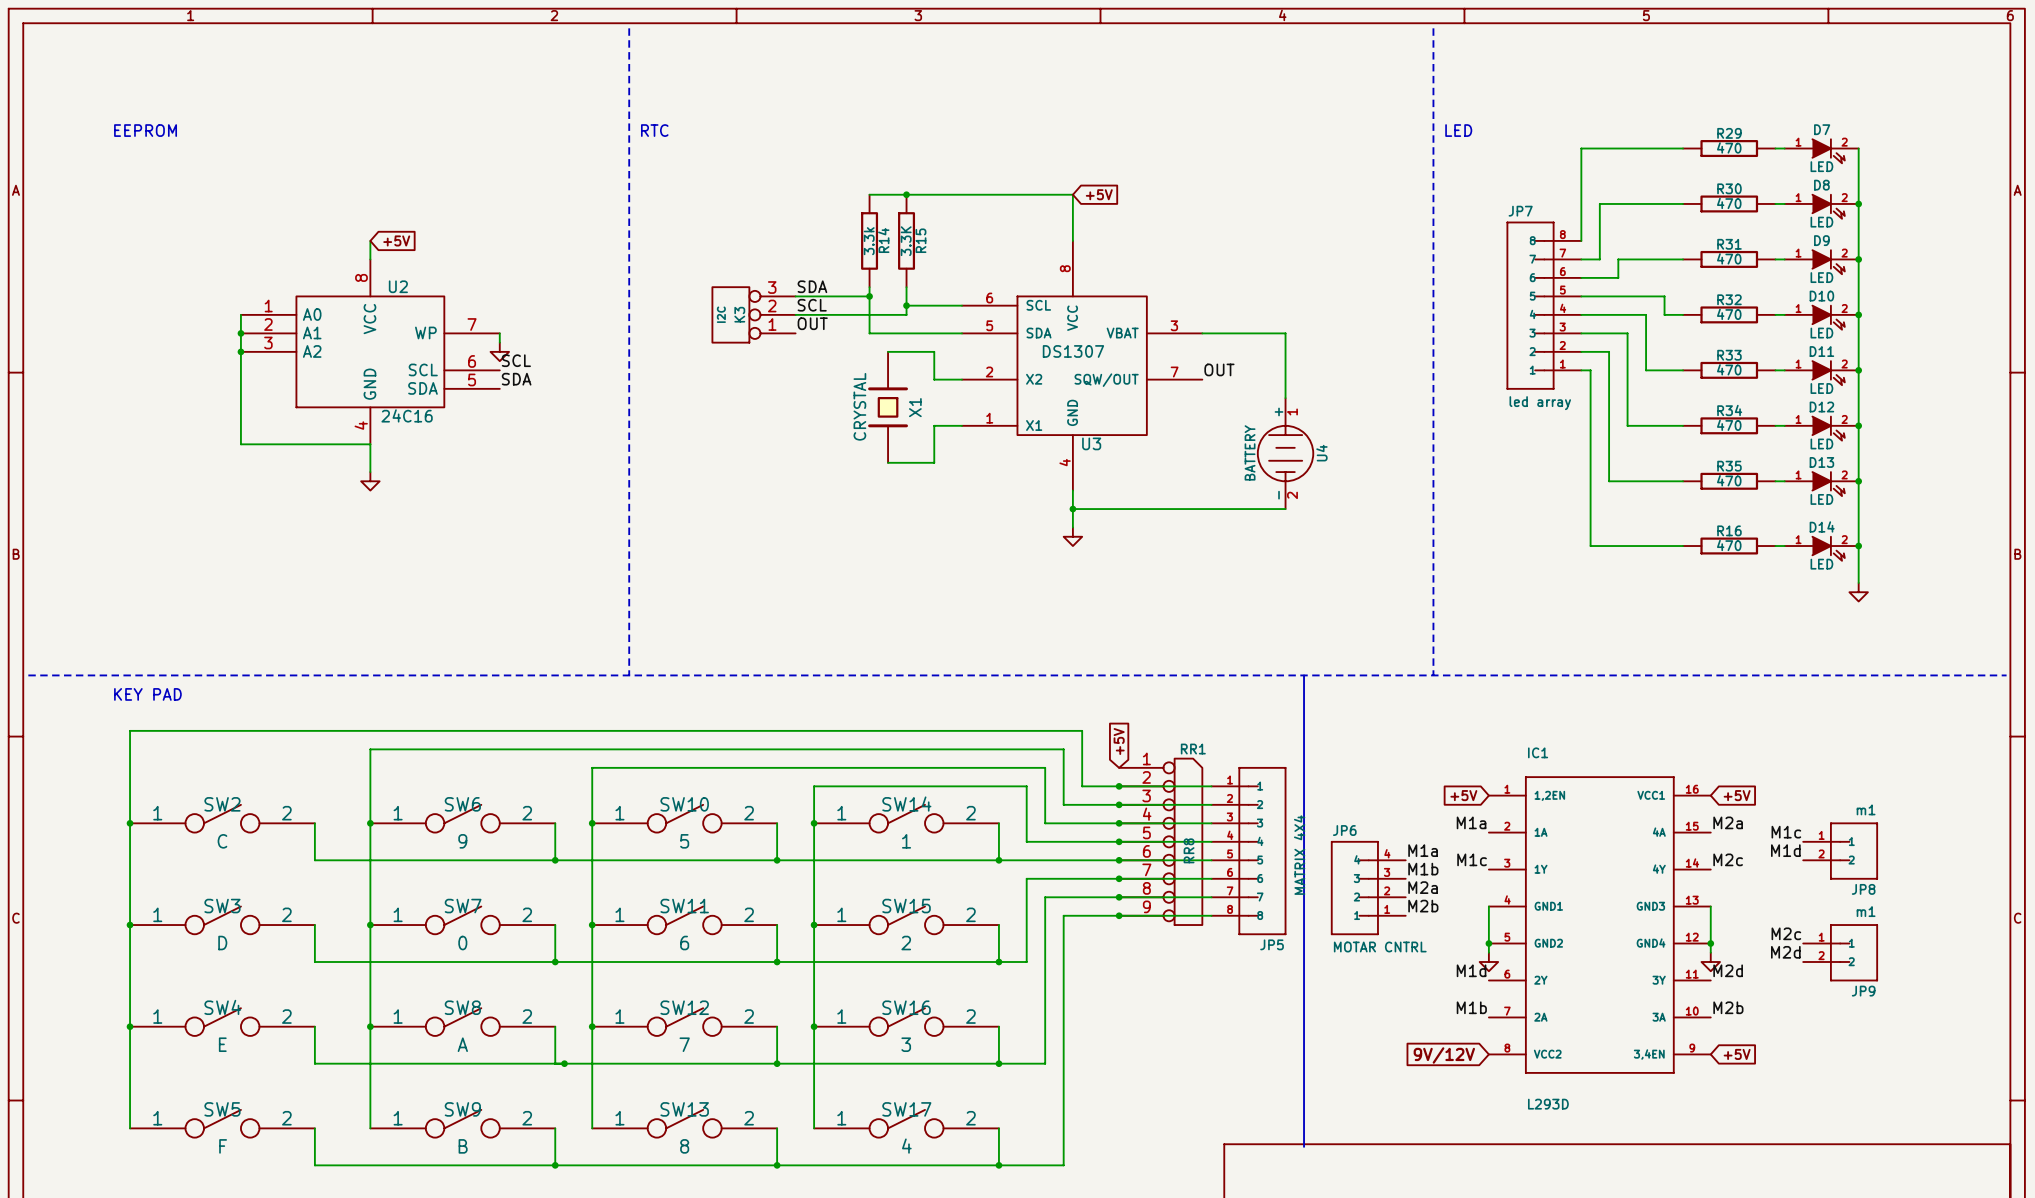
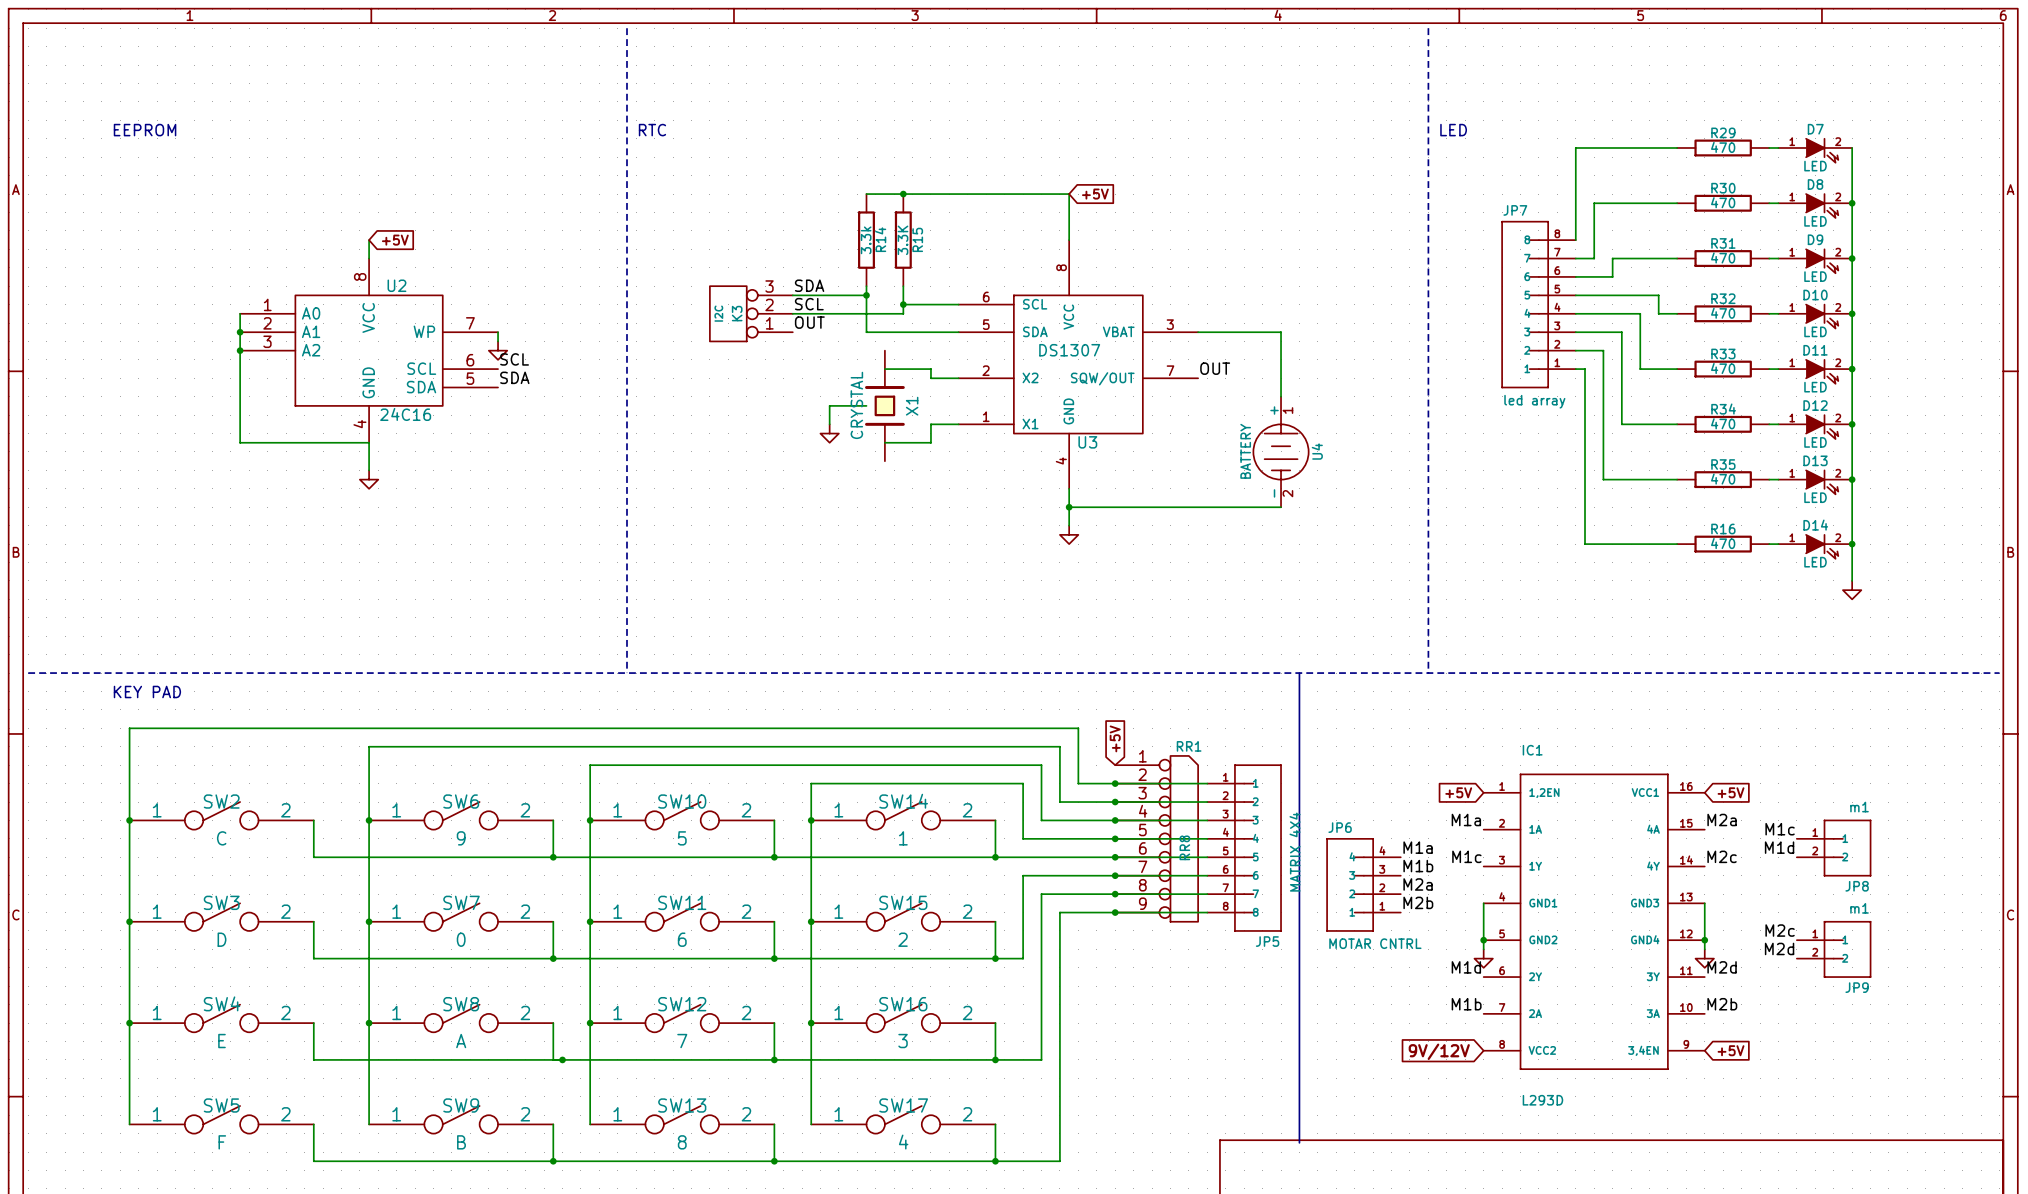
wire: (888, 351) (934, 351) (934, 370) -> (884, 369) (930, 369)
wire: none -> (866, 405) (829, 405) (829, 424)
power symbol: none -> (829, 433)
wire: (934, 444) (934, 462) (888, 462) -> (930, 442) (884, 442)

